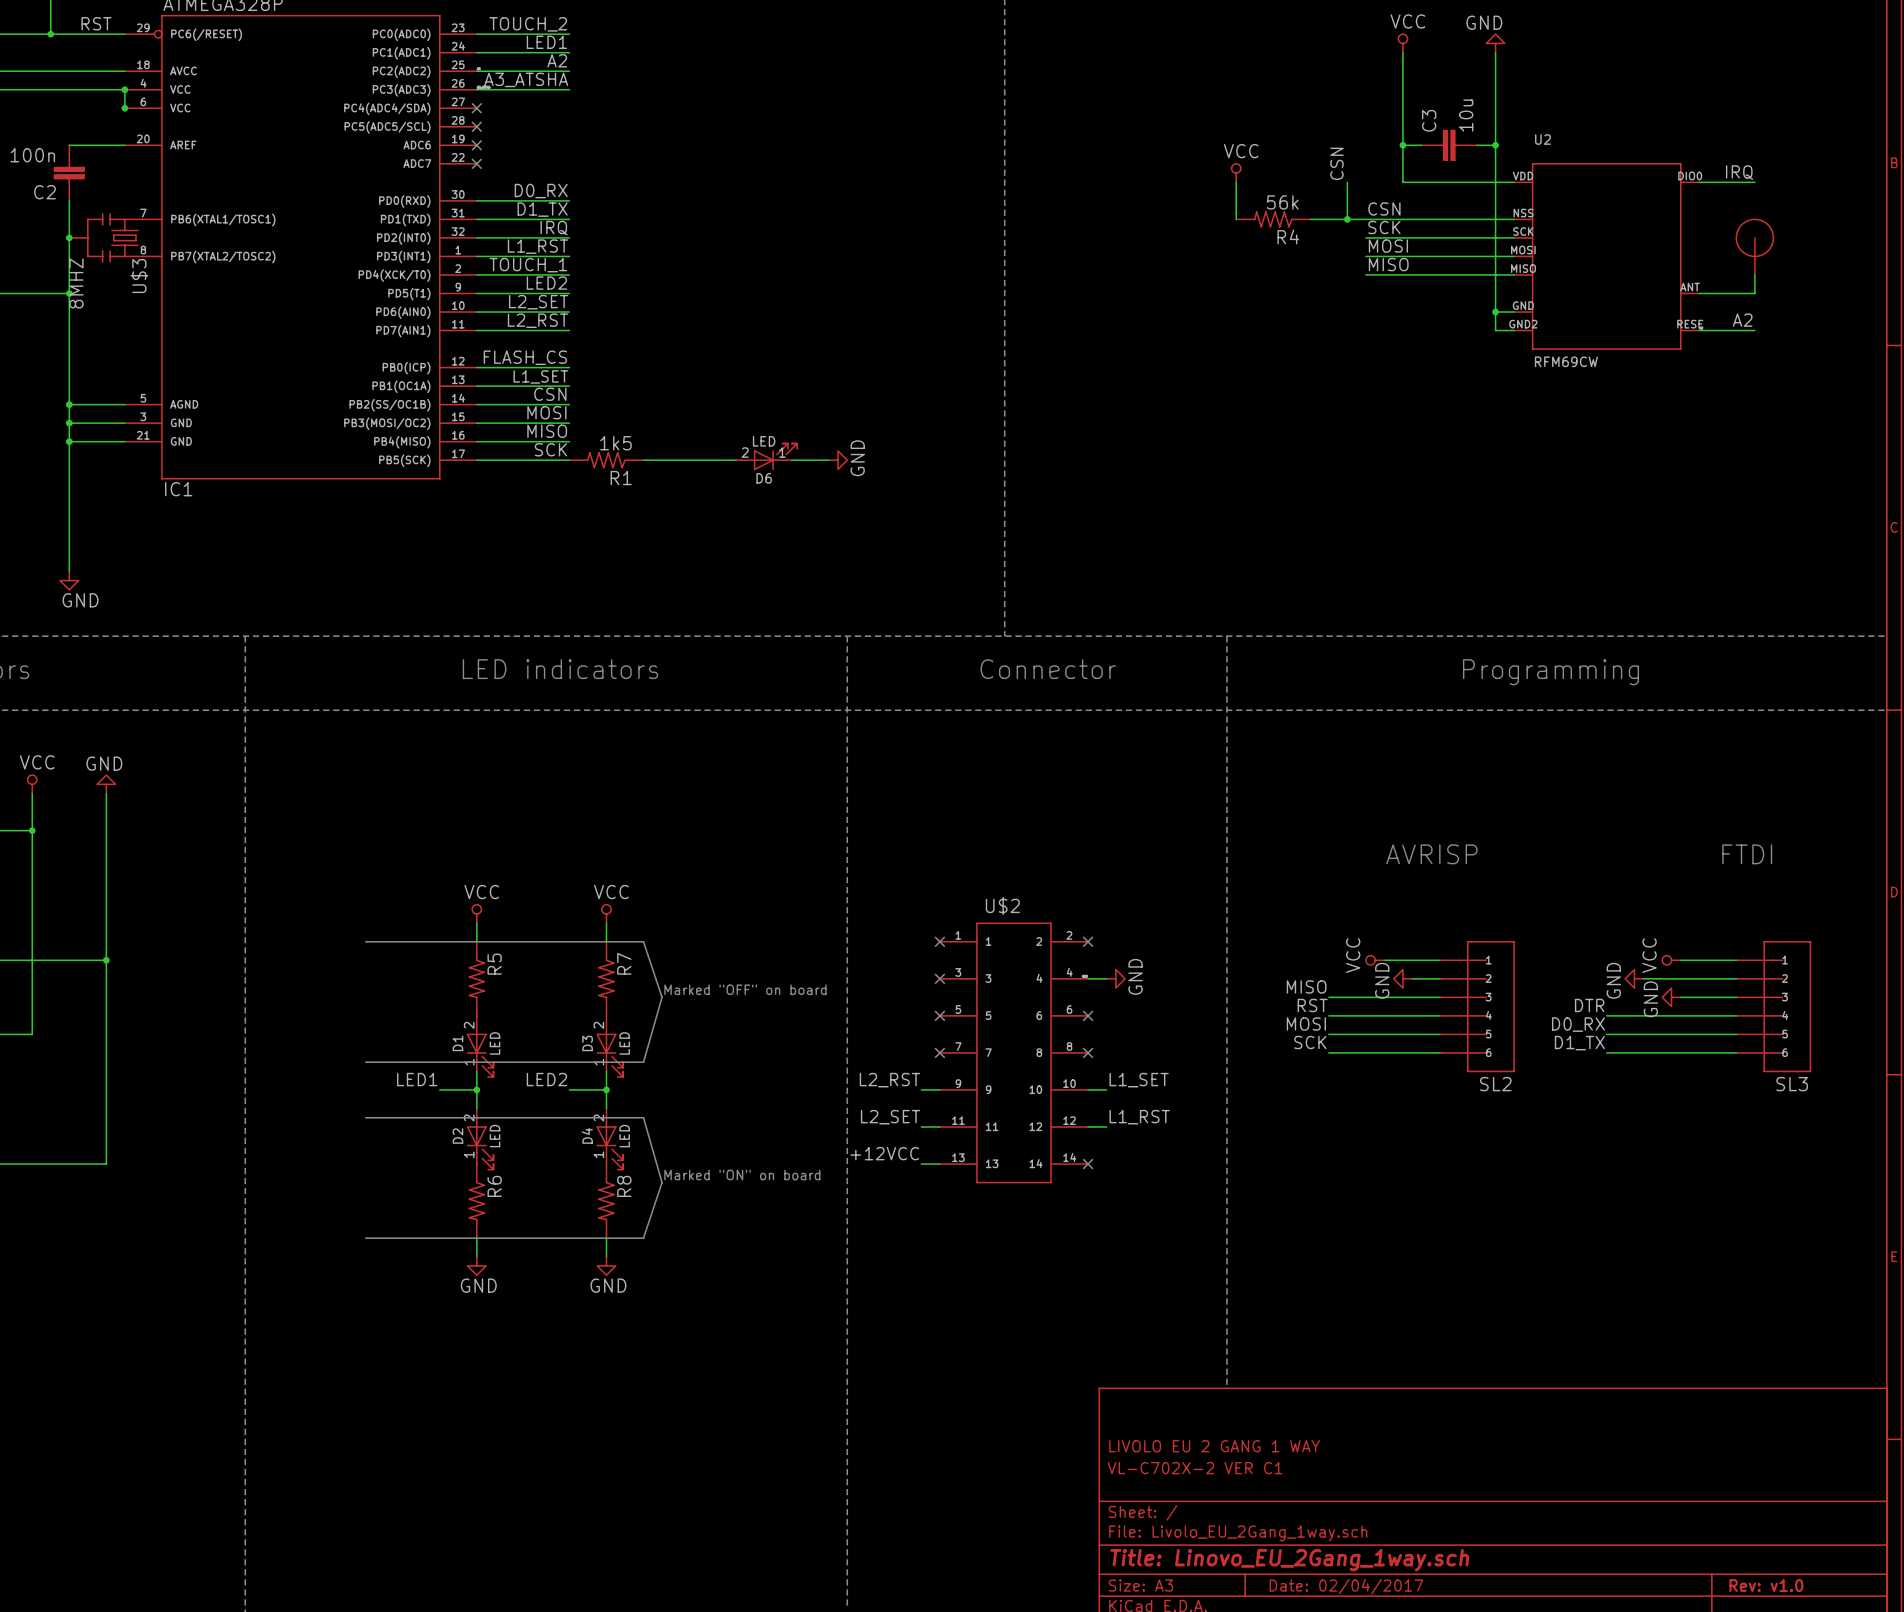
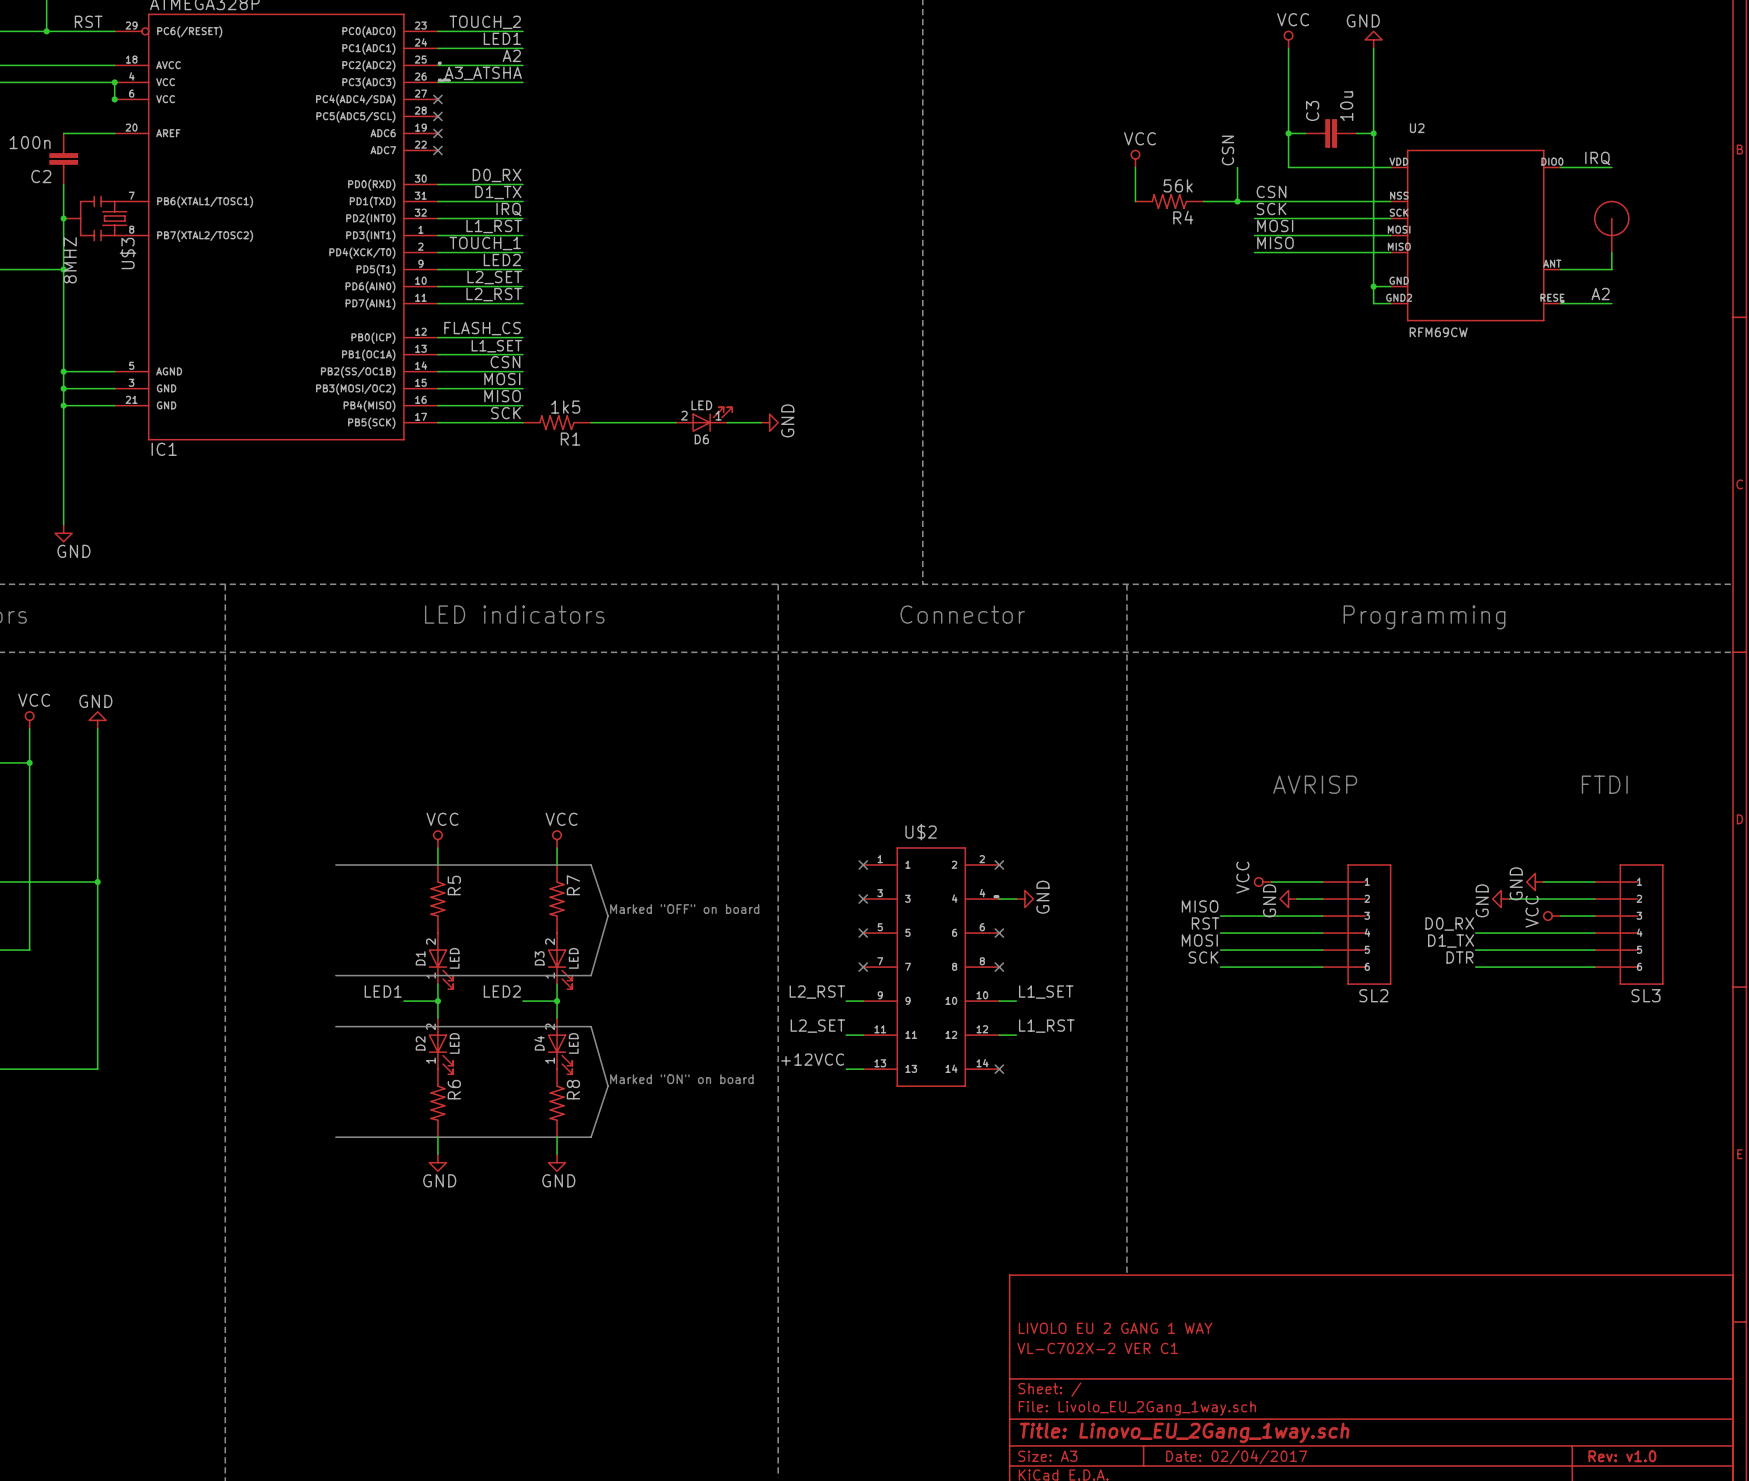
power symbol: VCC (1671, 960) -> GND (1535, 882)
power symbol: GND (1671, 997) -> none
power symbol: none -> VCC (1552, 916)
label: DTR (1589, 1005) -> D0_RX (1449, 924)
label: D0_RX (1578, 1024) -> D1_TX (1451, 941)
label: D1_TX (1579, 1043) -> DTR (1460, 957)

